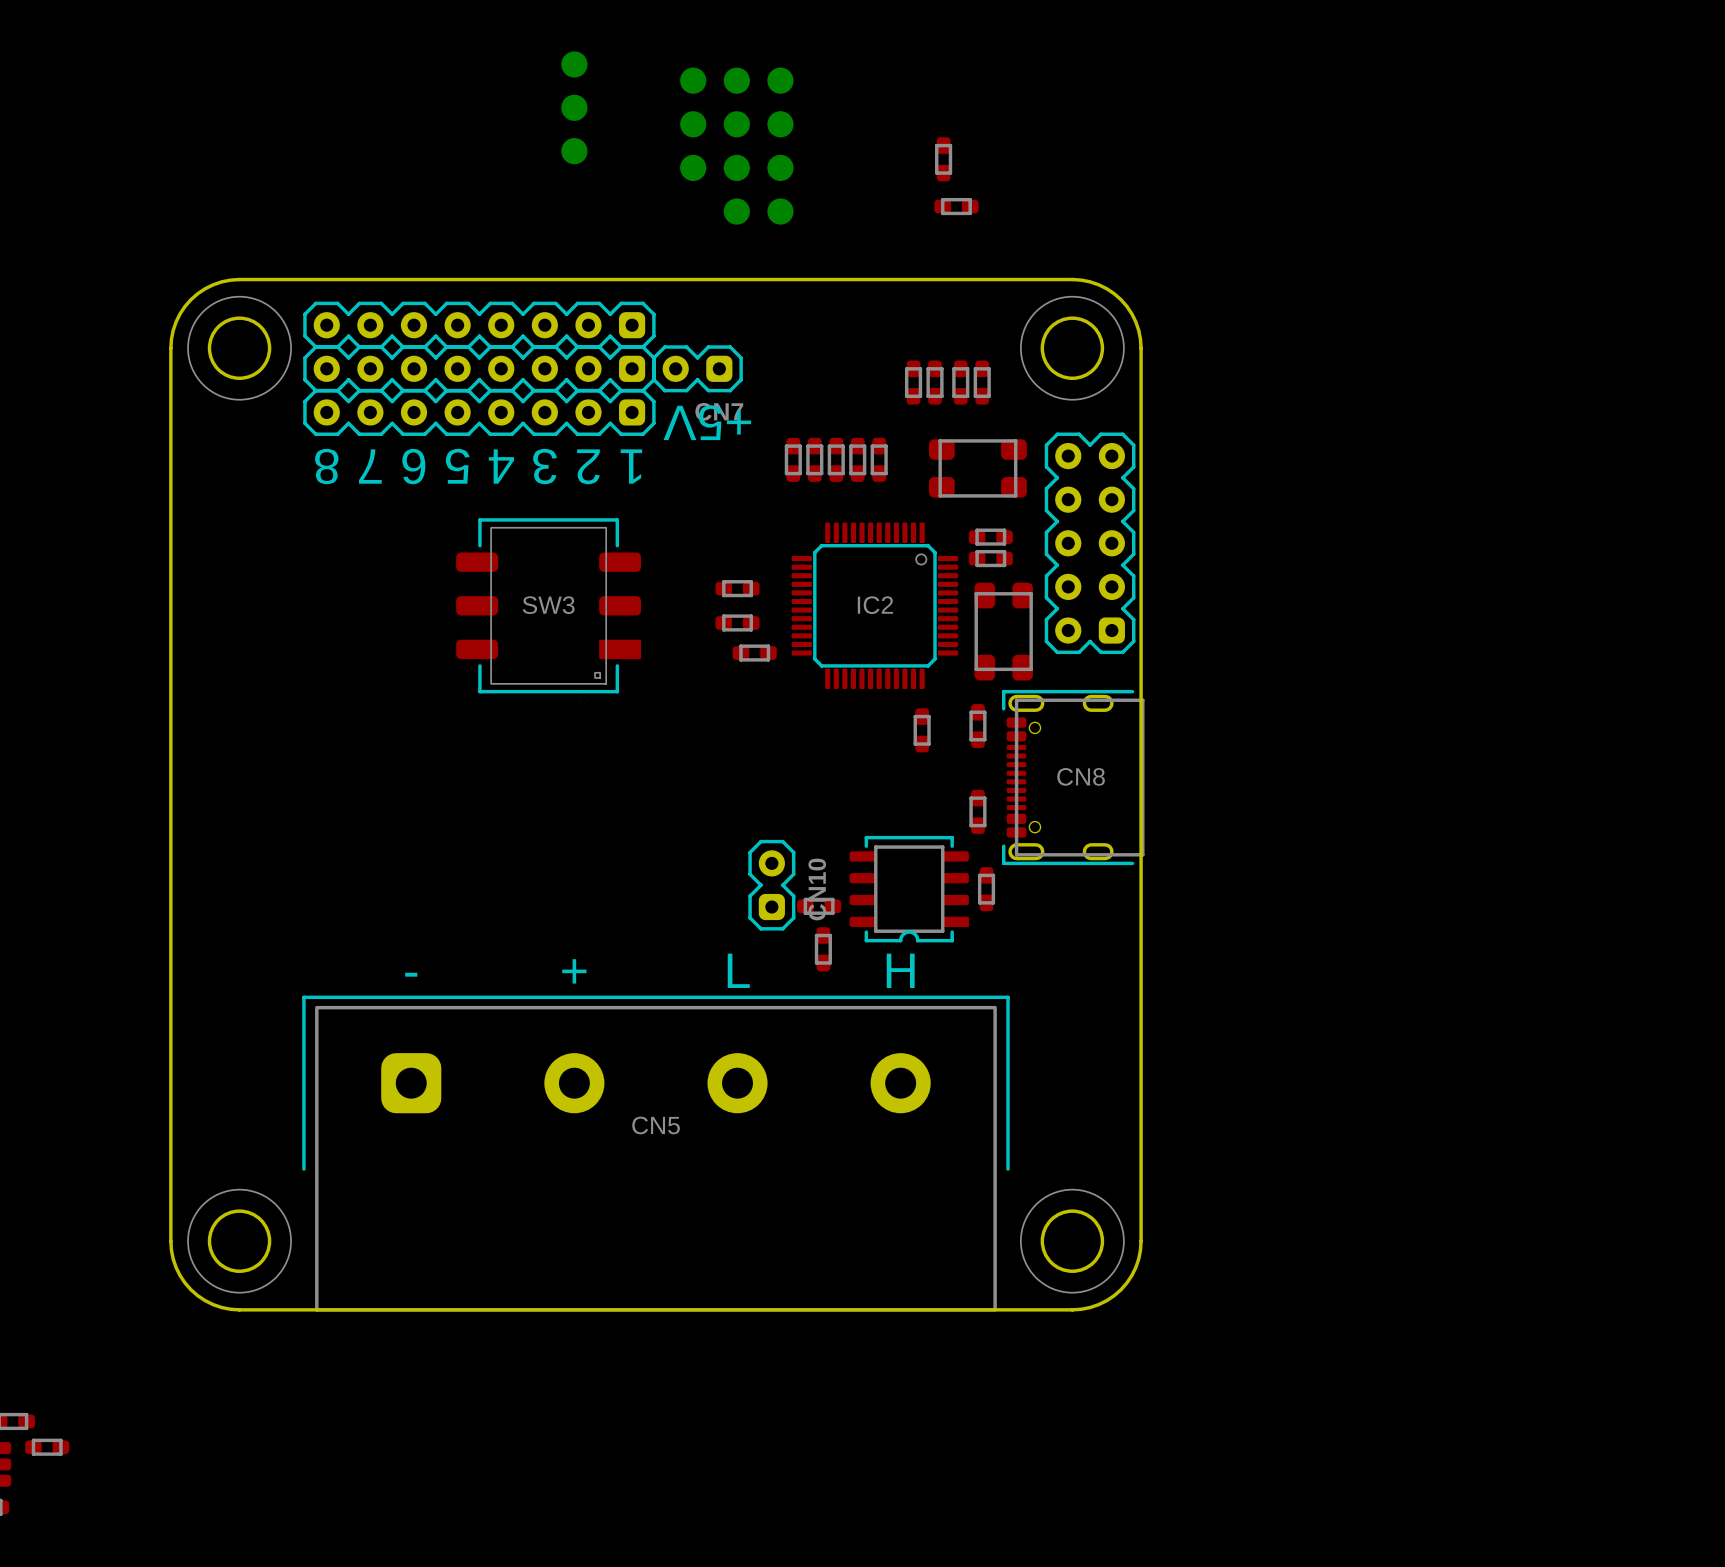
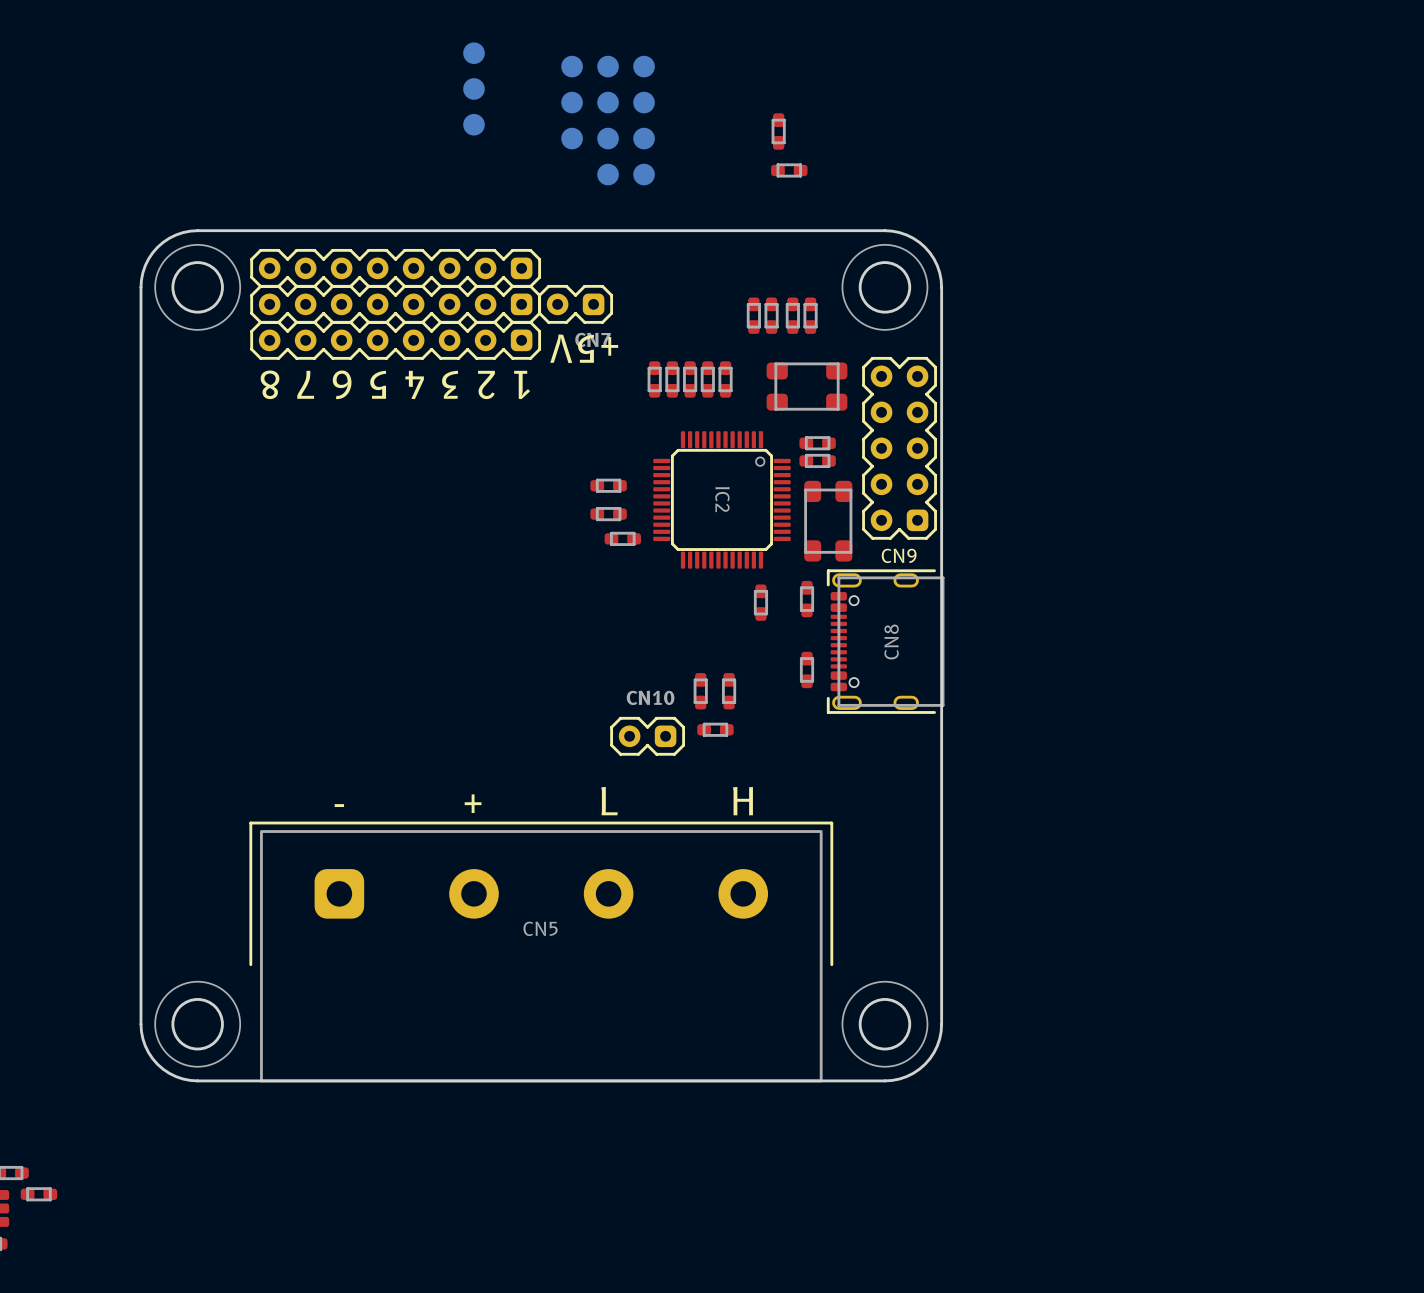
IC2 name rotation: 0° (875, 605) -> 90° clockwise (722, 499)
SW3: (548, 611) -> none
CN9 name: none -> CN9 (899, 555)
CN8 name rotation: 0° (1081, 776) -> 90° counterclockwise (891, 641)
part: none -> (700, 691)
part: none -> (729, 691)
part: none -> (715, 729)
CN10 rotation: 0° (771, 885) -> 90° counterclockwise (647, 736)
part: (909, 889) -> none
part: (986, 889) -> none
part: (819, 906) -> none
part: (823, 949) -> none

